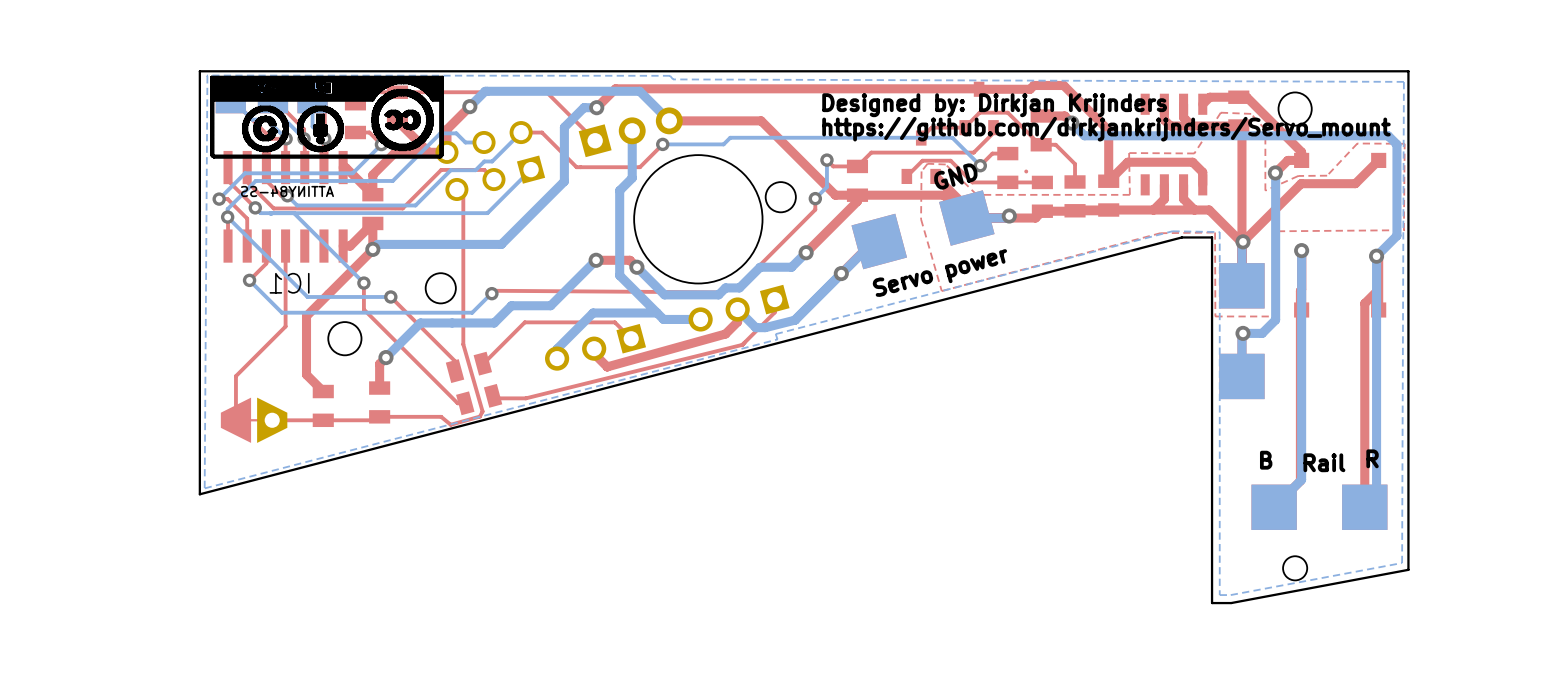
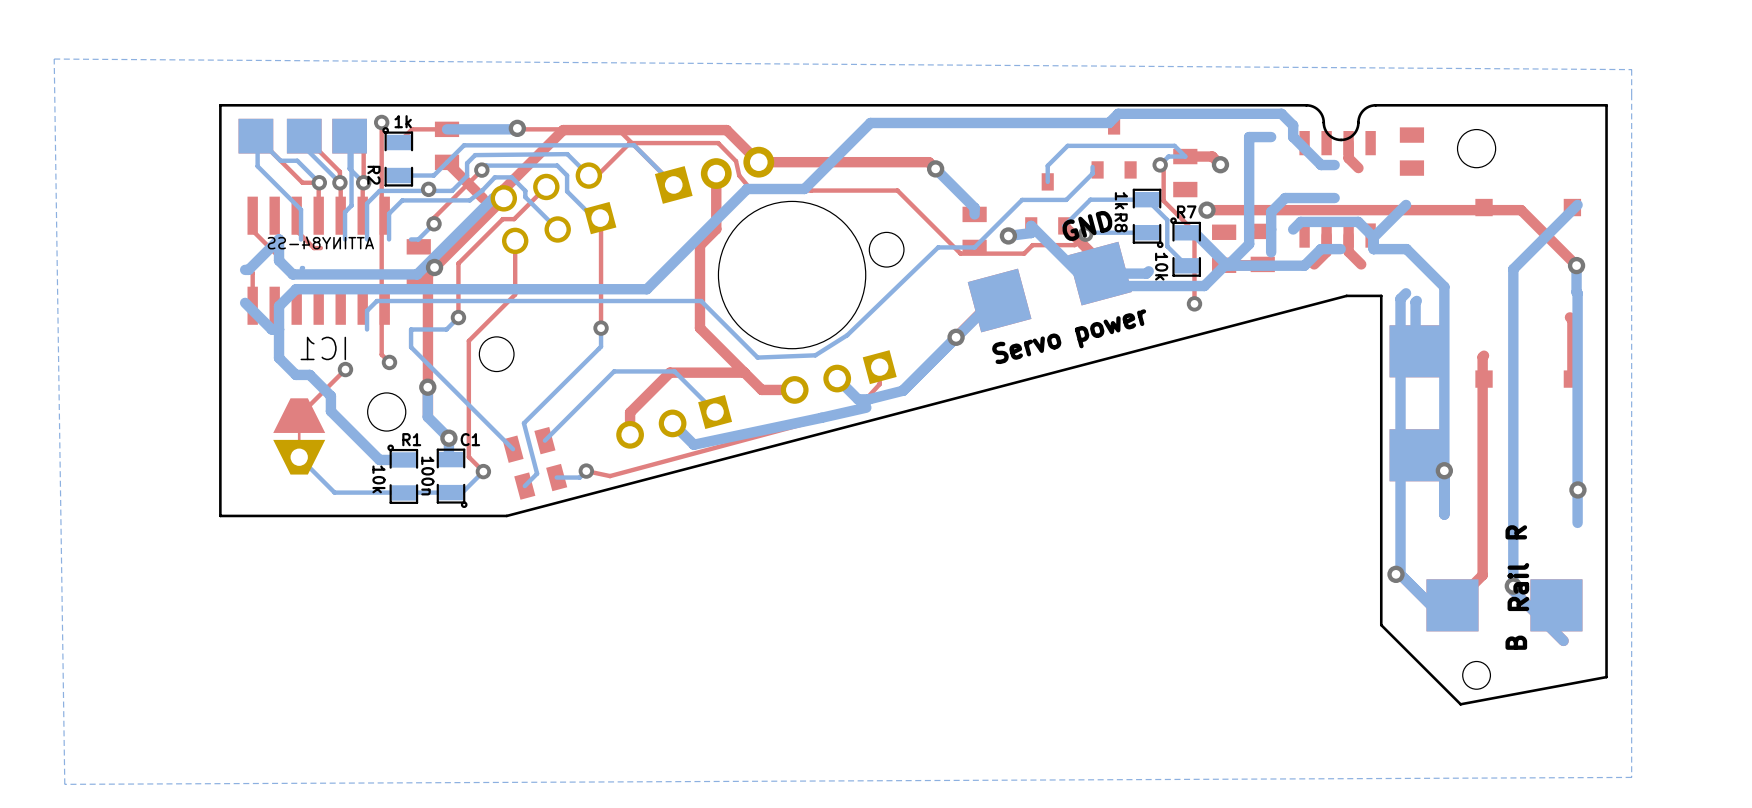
board edge: (1207, 71) (1146, 71) -> (1375, 105) (1363, 110) (1359, 116) (1354, 133) (1347, 138) (1341, 139) (1328, 134) (1325, 129) (1320, 112) (1313, 106) (1306, 105)
bottom zone outline: (206, 75) (670, 75) (673, 79) (1403, 81) (1402, 563) (1230, 595) (1219, 595) (1219, 232) (1172, 231) (775, 334) (777, 339) (204, 488) (206, 75) -> (54, 59) (1631, 69) (1631, 777) (64, 784) (54, 59)
drawing: [210, 76, 444, 159] -> none
top track: none -> (381, 122) (381, 354) (389, 362)
via: none -> (381, 122)
bottom track: none -> (517, 128) (447, 129)
bottom track: none -> (257, 135) (257, 166) (301, 209) (301, 239)
bottom track: none -> (351, 135) (351, 205) (345, 212) (345, 239)
bottom track: none -> (1271, 137) (1249, 137) (1249, 244) (1227, 265) (1194, 232) (1183, 232)
top track: (1164, 104) (1164, 120) (1170, 126) (1238, 126) (1241, 129) (1241, 285) -> none
top track: (1202, 104) (1209, 97) (1246, 97) (1301, 152) (1301, 160) (1287, 160) (1275, 172) -> none
text: Designed by: Dirkjan Krijnders (994, 105) -> none
top track: (469, 106) (446, 129) (446, 144) -> (758, 162) (726, 130) (563, 130) (503, 189)
bottom track: (469, 106) (485, 91) (639, 91) (669, 120) -> none
via position: (469, 106) -> (517, 128)
top track: (596, 107) (615, 88) (1030, 89) (1033, 85) (1063, 85) (1108, 130) (1108, 181) (1127, 162) (1192, 162) (1202, 172) (1202, 184) -> none
bottom track: (596, 107) (584, 107) (564, 127) (564, 181) (501, 244) (377, 244) (372, 249) -> none
via: (596, 107) -> none
top zone outline: (1220, 112) (1251, 113) (1265, 129) (1265, 190) (1298, 175) (1327, 175) (1357, 143) (1404, 143) (1404, 230) (1277, 231) (1279, 316) (1215, 316) (1215, 232) (1160, 233) (941, 291) (921, 219) (921, 171) (927, 163) (945, 164) (976, 194) (1129, 194) (1129, 153) (1194, 153) (1220, 112) -> none
R2 side: top (355, 118) -> bottom (397, 156)
top track: (761, 120) (835, 195) (943, 195) (966, 218) (1035, 218) (1042, 211) (1075, 210) (1209, 210) (1241, 242) -> (864, 162) (928, 162) (935, 168)
top track: none -> (1160, 164) (1163, 168) (1163, 200) (1194, 231) (1194, 303)
bottom track: none -> (1160, 164) (1168, 156) (1185, 156) (1174, 145) (1067, 145) (1047, 165) (1047, 181)
via: none -> (1160, 164)
bottom track: (1071, 123) (1084, 135) (1388, 135) (1396, 144) (1396, 235) (1376, 256) (1376, 495) (1364, 507) -> none
bottom track: none -> (1334, 165) (1321, 165) (1293, 137) (1293, 125) (1281, 113) (1118, 113) (1109, 122) (870, 122) (804, 188) (747, 188) (646, 289) (296, 289) (279, 306) (279, 358) (295, 374) (309, 374) (330, 396) (330, 411) (379, 459) (403, 459)
bottom track: none -> (1092, 166) (1092, 173) (1066, 199) (1022, 199) (974, 247) (938, 247) (847, 335) (815, 355) (757, 357) (701, 301) (376, 301) (367, 310) (367, 329)
bottom track: none -> (935, 168) (974, 207) (974, 214)
via: none -> (935, 168)
top track: none -> (481, 170) (434, 217) (434, 223)
via: none -> (481, 170)
top track: (993, 127) (993, 132) (973, 152) (871, 152) (857, 166) (833, 166) (826, 160) -> none
text: https://github.com/dirkjankrijnders/Servo_mount (1106, 129) -> none
top track: none -> (716, 173) (716, 229) (699, 245) (699, 328) (761, 389) (794, 389)
bottom track: (632, 130) (632, 178) (619, 190) (619, 275) (663, 319) (700, 319) -> none
top track: (355, 132) (369, 132) (381, 144) -> none
bottom track: none -> (398, 175) (433, 175) (464, 145) (634, 145) (673, 184)
bottom track: (521, 132) (492, 161) (484, 161) (475, 170) (450, 170) (415, 205) (297, 205) (287, 195) -> (588, 175) (567, 154) (475, 155) (467, 163) (467, 176) (452, 190) (379, 190) (367, 203) (367, 239)
top track: (528, 132) (541, 132) (576, 167) (639, 167) (662, 144) -> (597, 175) (629, 143) (718, 143) (736, 161) (739, 175) (751, 190) (897, 190) (960, 253) (1024, 253) (1032, 245) (1074, 245) (1085, 234)
top track: (921, 138) (931, 127) (964, 127) (979, 112) (1007, 112) (1039, 144) (1055, 144) (1075, 164) (1075, 181) -> none
top track: none -> (546, 186) (514, 219) (502, 219) (458, 263) (458, 317)
bottom track: (484, 142) (465, 142) (456, 133) (440, 133) (392, 180) (255, 180) (227, 209) (227, 217) (307, 296) (390, 296) -> none
bottom track: (381, 144) (352, 173) (244, 173) (219, 199) -> none
bottom track: (662, 144) (723, 144) (730, 137) (952, 137) (980, 165) -> none
via: (662, 144) -> none
top track: (446, 152) (395, 152) (372, 174) (372, 194) (345, 167) (343, 167) -> (503, 198) (427, 274) (427, 417)
bottom track: none -> (503, 198) (493, 198) (417, 274) (292, 274) (279, 260) (279, 239) (248, 269) (245, 269)
bottom track: none -> (1334, 198) (1285, 198) (1271, 212) (1271, 252)
top track: (1007, 153) (992, 153) (980, 165) -> none
bottom track: none -> (1406, 204) (1373, 237)
bottom track: none -> (1577, 204) (1513, 269) (1513, 590) (1563, 640)
bottom track: (826, 160) (826, 187) (815, 198) -> none
via: (826, 160) -> none
top track: (1378, 160) (1355, 183) (1301, 183) (1241, 242) -> none
top track: none -> (1206, 210) (1521, 210) (1576, 265)
via: none -> (1206, 210)
via: (980, 165) -> none
top track: (247, 167) (247, 181) (273, 208) (402, 208) (441, 169) (484, 169) (493, 179) -> none
R8 side: top (1007, 167) -> bottom (1148, 218)
top track: none -> (600, 218) (601, 328)
bottom track: (531, 169) (487, 213) (260, 213) (255, 207) -> (600, 218) (593, 218) (567, 191) (567, 175) (557, 165) (486, 165) (481, 170)
bottom track: (1275, 172) (1275, 319) (1262, 333) (1241, 334) (1241, 376) -> none
via: (1275, 172) -> none
bottom track: none -> (434, 223) (418, 239) (411, 239)
via: none -> (434, 223)
top track: (906, 176) (922, 160) (950, 160) (972, 182) (1042, 182) -> none
bottom track: none -> (1064, 225) (1090, 199) (1147, 199) (1167, 219) (1167, 246) (1186, 265)
bottom track: none -> (557, 229) (525, 197) (525, 190) (511, 177) (494, 177) (469, 200) (402, 200) (389, 213) (389, 239)
bottom track: none -> (1293, 229) (1300, 221) (1358, 221) (1373, 237)
bottom track: none -> (1147, 232) (1085, 234)
via: none -> (1085, 234)
bottom track: none -> (1008, 235) (1031, 233) (1031, 225) (1078, 273) (1100, 273) (1112, 286) (1204, 286) (1224, 265) (1304, 265) (1320, 249) (1340, 249)
via: none -> (1008, 235)
bottom track: none -> (1373, 237) (1373, 249) (1406, 249) (1444, 286) (1444, 514)
top track: (456, 189) (463, 195) (463, 344) (482, 411) (479, 416) (450, 424) (441, 416) (379, 416) (376, 420) (272, 420) -> (515, 240) (515, 294) (468, 340) (468, 457) (483, 471)
via: (287, 195) -> none
top track: (857, 195) (857, 201) (806, 252) -> none
R7 side: top (1042, 196) -> bottom (1185, 247)
top track: (815, 198) (815, 209) (737, 287) (718, 292) (494, 290) (491, 293) -> none
via: (815, 198) -> none
top track: (219, 199) (227, 199) (247, 218) (247, 246) -> none
via: (219, 199) -> none
via: (255, 207) -> none
bottom track: none -> (1576, 265) (1577, 522)
via: none -> (1576, 265)
via: none -> (434, 267)
bottom track: (293, 213) (363, 283) -> none
via: (1009, 216) -> none
via: (227, 217) -> none
bottom track: none -> (1406, 293) (1400, 298) (1400, 574)
board edge: (1181, 237) (199, 494) (199, 429) -> (1346, 295) (506, 515) (220, 515)
via: (1243, 241) -> none
bottom track: none -> (245, 302) (271, 329) (279, 329)
via: none -> (1194, 303)
top track: (266, 246) (266, 263) (249, 280) -> none
top track: (285, 246) (285, 326) (235, 376) (235, 420) -> none
top track: (343, 246) (350, 246) (372, 223) (372, 249) (306, 316) (306, 374) (323, 391) -> none
via: (372, 249) -> none
bottom track: (1301, 250) (1301, 479) (1274, 507) -> none
via: (1301, 250) -> none
bottom track: (806, 252) (791, 267) (760, 267) (739, 287) (725, 287) (718, 294) (664, 294) (636, 267) -> none
via: (806, 252) -> none
bottom track: none -> (458, 317) (446, 329) (411, 329) (411, 347) (513, 449)
via: none -> (458, 317)
via: (1376, 256) -> none
top track: (1377, 257) (1377, 290) (1364, 303) (1364, 507) -> none
top track: (596, 260) (629, 260) (636, 267) -> none
bottom track: (596, 260) (550, 305) (511, 305) (494, 322) (420, 322) (385, 357) -> none
via: (596, 260) -> none
bottom track: none -> (601, 328) (601, 346) (523, 423) (537, 473) (524, 486)
via: none -> (601, 328)
via: (636, 267) -> none
bottom track: (249, 280) (281, 312) (472, 312) (491, 293) -> none
via: (249, 280) -> none
top track: (363, 283) (363, 309) (457, 403) (465, 403) -> none
via position: (363, 283) -> (389, 362)
via: (491, 293) -> none
top track: (390, 296) (455, 361) (455, 371) -> none
via: (390, 296) -> none
top track: none -> (345, 369) (299, 415)
via: none -> (345, 369)
top track: none -> (744, 372) (670, 372) (630, 412) (630, 434)
top track: (737, 309) (737, 321) (725, 334) (607, 366) (594, 353) (594, 348) -> none
top track: (774, 312) (742, 344) (525, 398) (495, 398) (493, 395) -> (879, 381) (856, 409) (610, 476) (586, 471)
bottom track: (657, 313) (593, 313) (557, 349) (557, 358) -> none
bottom track: none -> (427, 387) (427, 417) (448, 438) (448, 457) (450, 459)
via: none -> (427, 387)
via position: (1243, 333) -> (1444, 470)
bottom track: none -> (866, 407) (693, 444) (672, 423)
top track: (631, 338) (614, 322) (524, 322) (482, 363) -> none
bottom track: none -> (715, 412) (674, 371) (614, 371) (544, 440)
top track: (385, 357) (379, 363) (379, 388) -> none
via position: (385, 357) -> (448, 438)
bottom track: none -> (299, 457) (334, 492) (462, 492) (483, 471)
via: none -> (483, 471)
bottom track: none -> (586, 471) (579, 477) (556, 477)
via: none -> (586, 471)
C1 side: top (379, 402) -> bottom (452, 478)
R1 side: top (323, 405) -> bottom (402, 474)
via: none -> (1577, 489)
part rotation: 0° (254, 420) -> 90° clockwise (299, 436)
part position: (254, 420) -> (299, 436)
text rotation: 0° (1372, 458) -> 90° counterclockwise (1516, 532)
text position: R (1372, 458) -> R (1516, 532)
text rotation: 0° (1266, 460) -> 90° counterclockwise (1516, 642)
text position: B (1266, 460) -> B (1516, 642)
text rotation: 0° (1324, 462) -> 90° counterclockwise (1518, 587)
bottom track: none -> (1396, 574) (1400, 574) (1444, 618)
via: none -> (1396, 574)
via: none -> (1513, 586)
board edge: (1212, 524) (1212, 603) -> none
board edge: (1408, 569) (1231, 603) -> (1606, 677) (1460, 704) (1381, 625)
board edge: (1231, 603) (1212, 603) -> none

